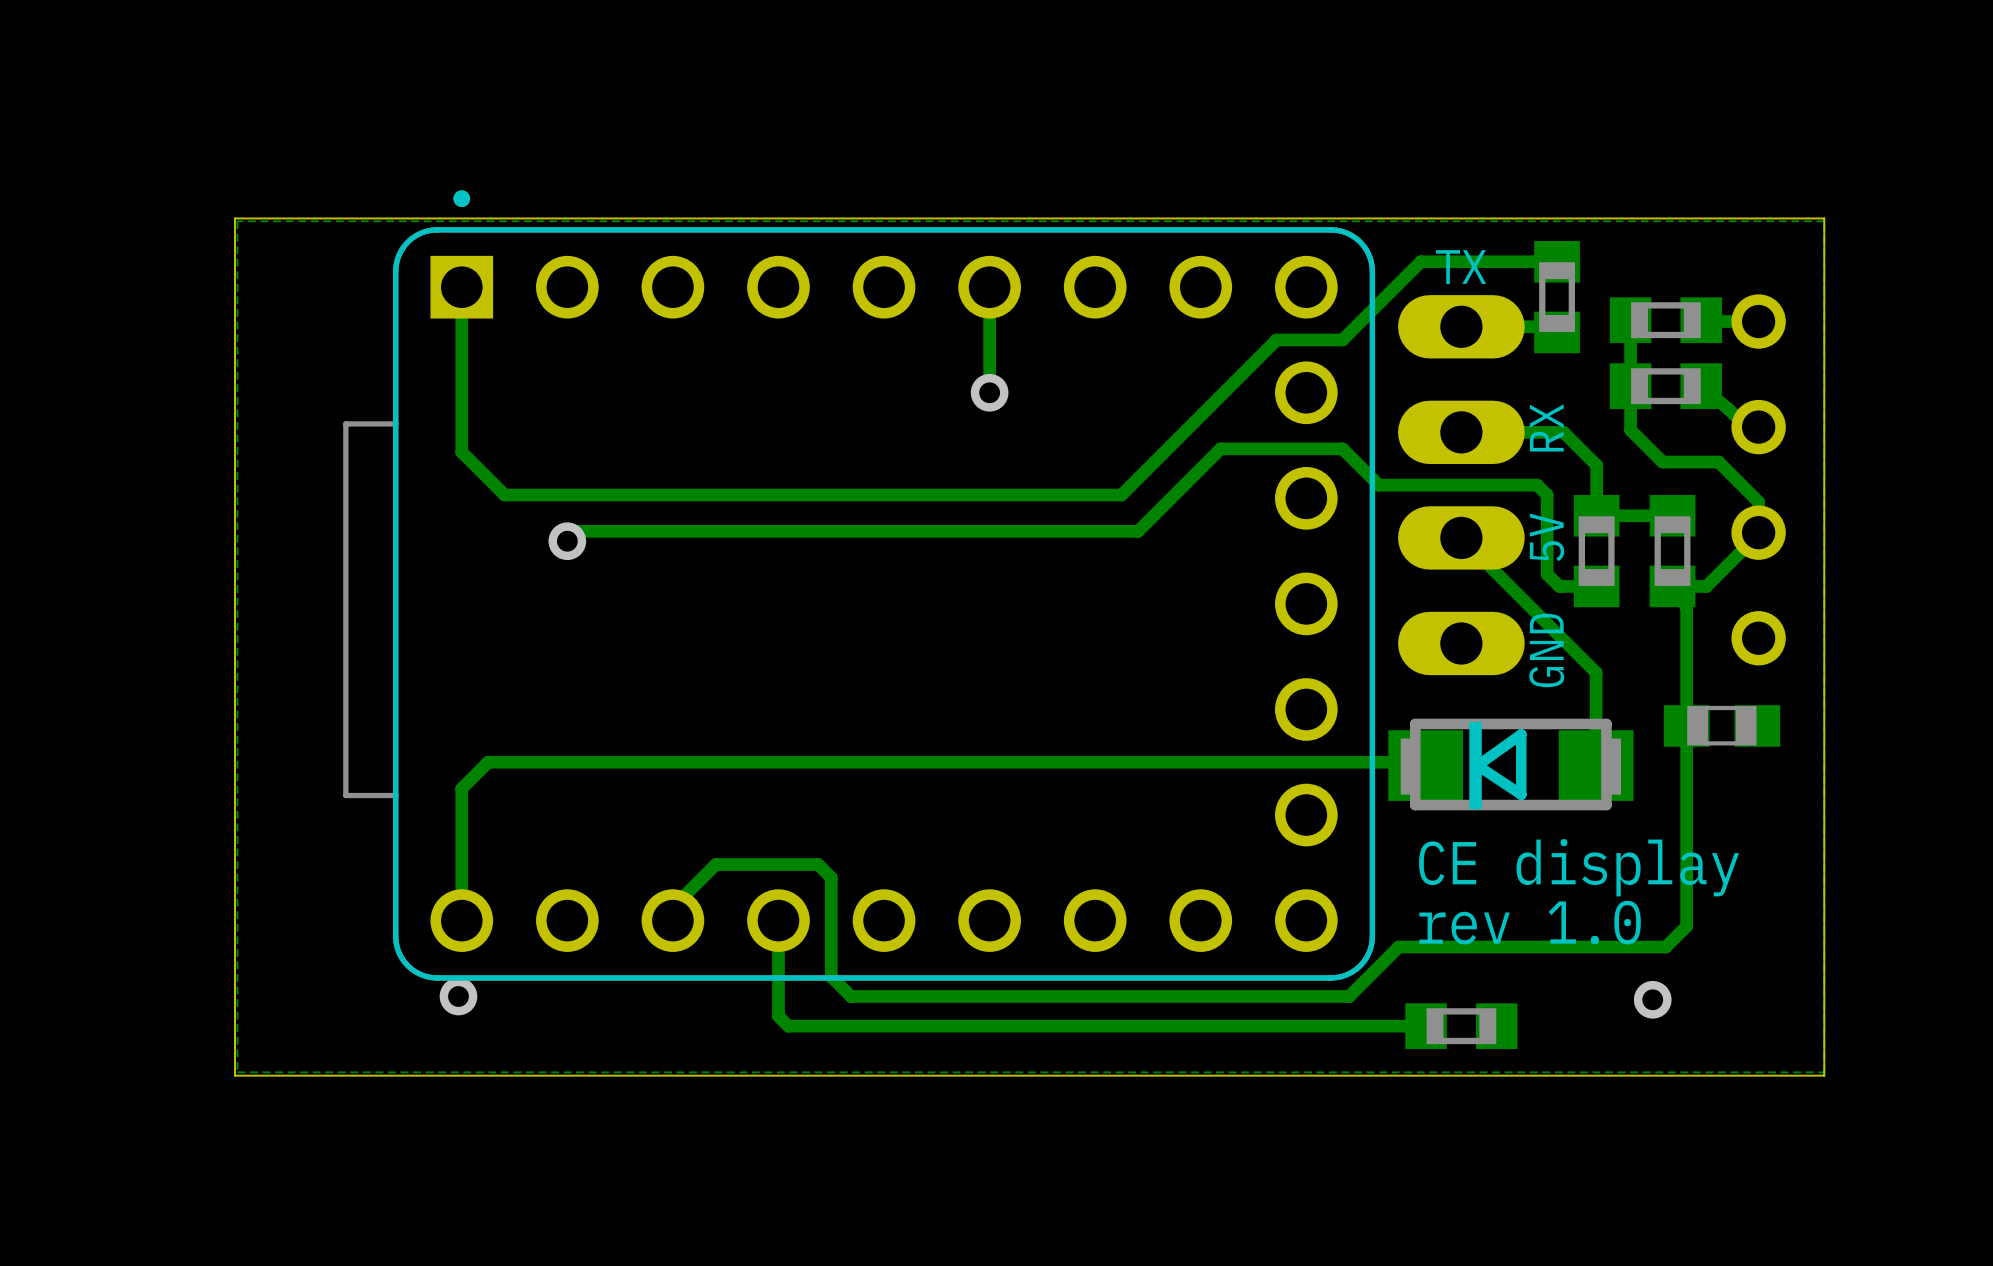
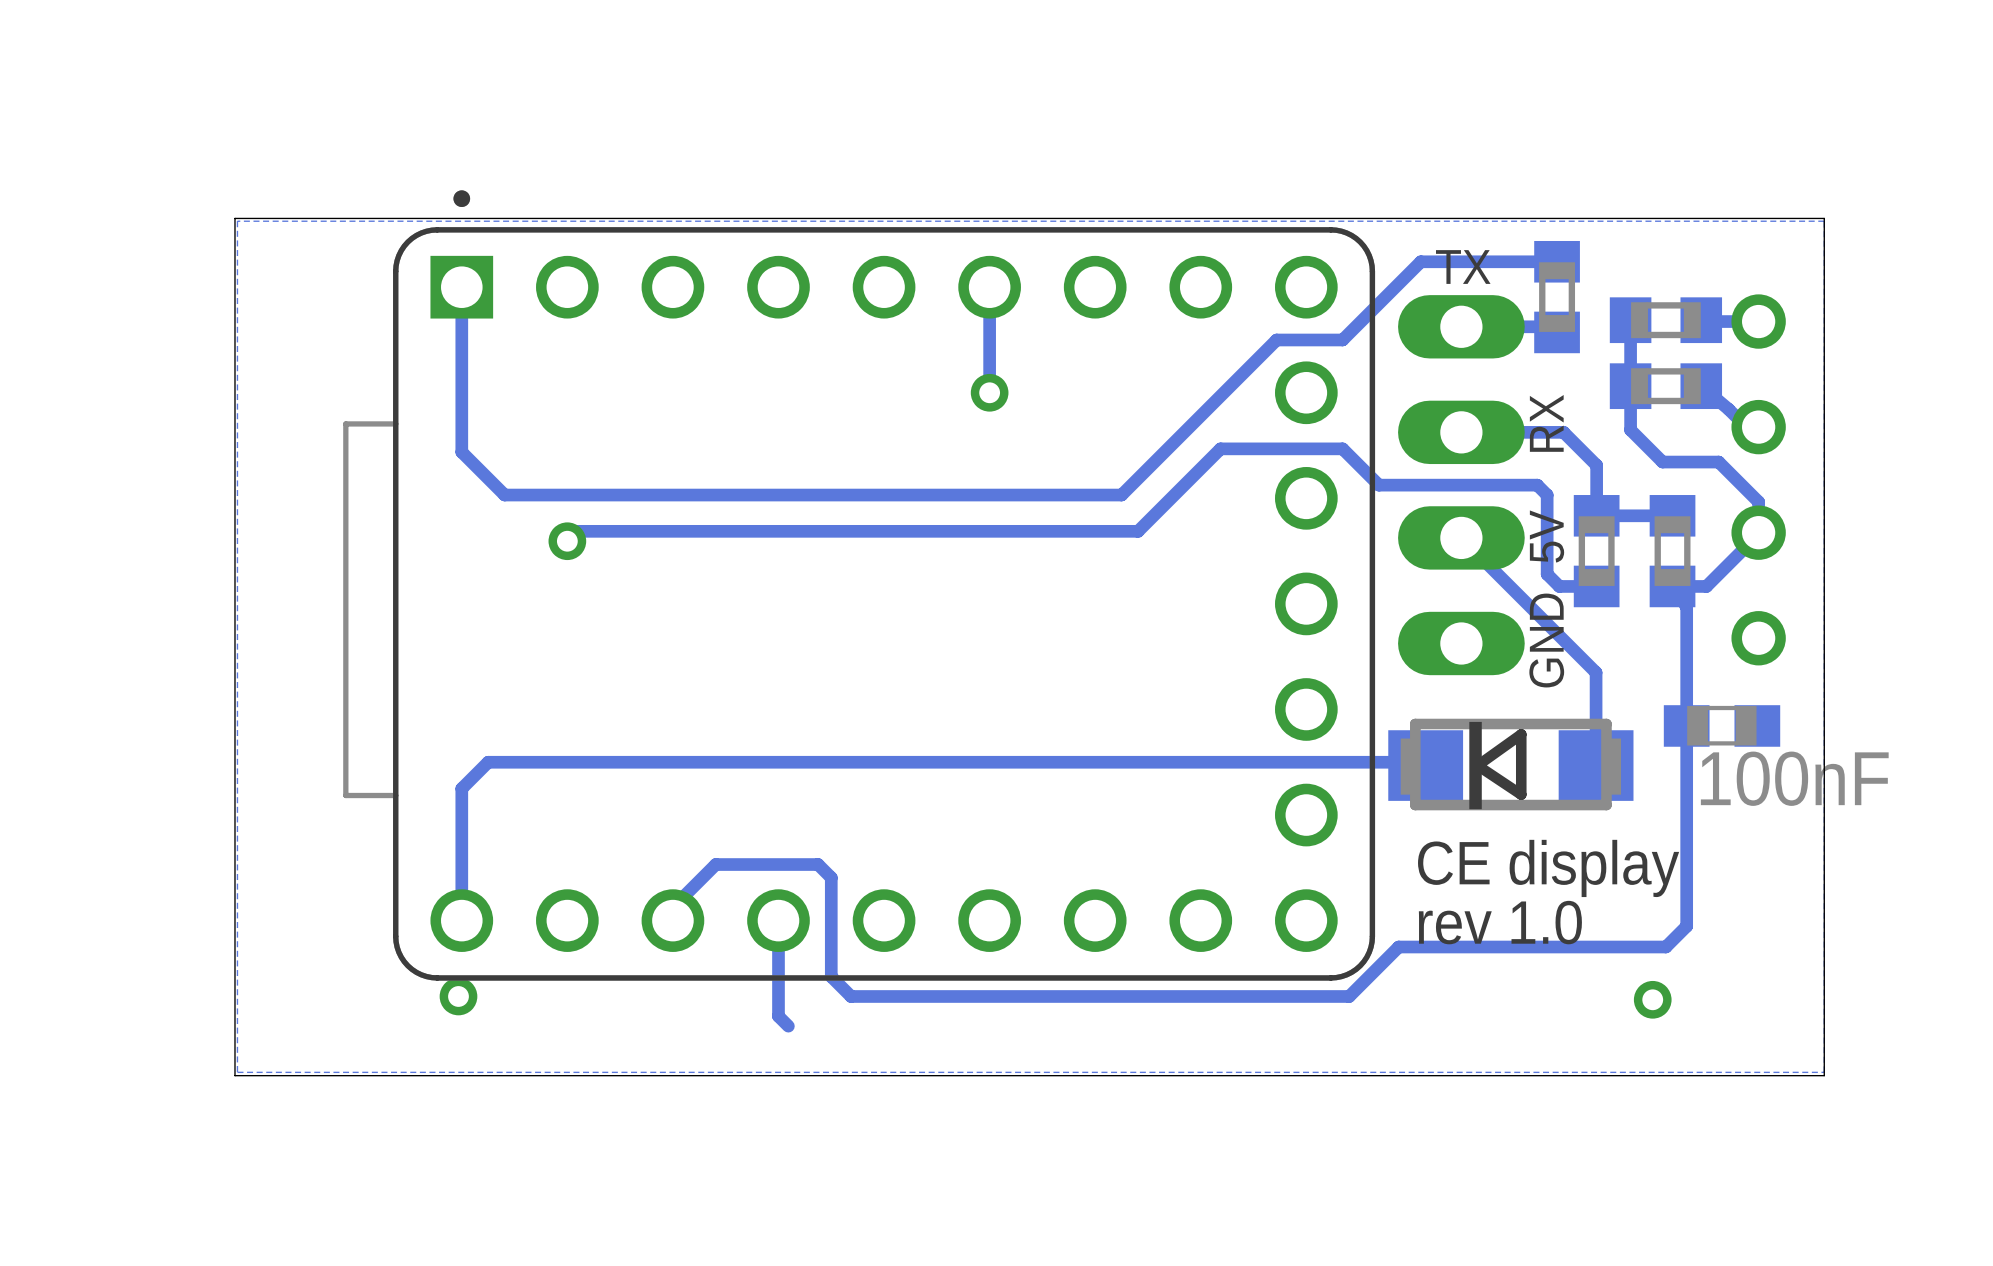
part value: none -> 100nF (1794, 778)
track: (1426, 1026) (788, 1026) -> none
part: (1461, 1026) -> none

